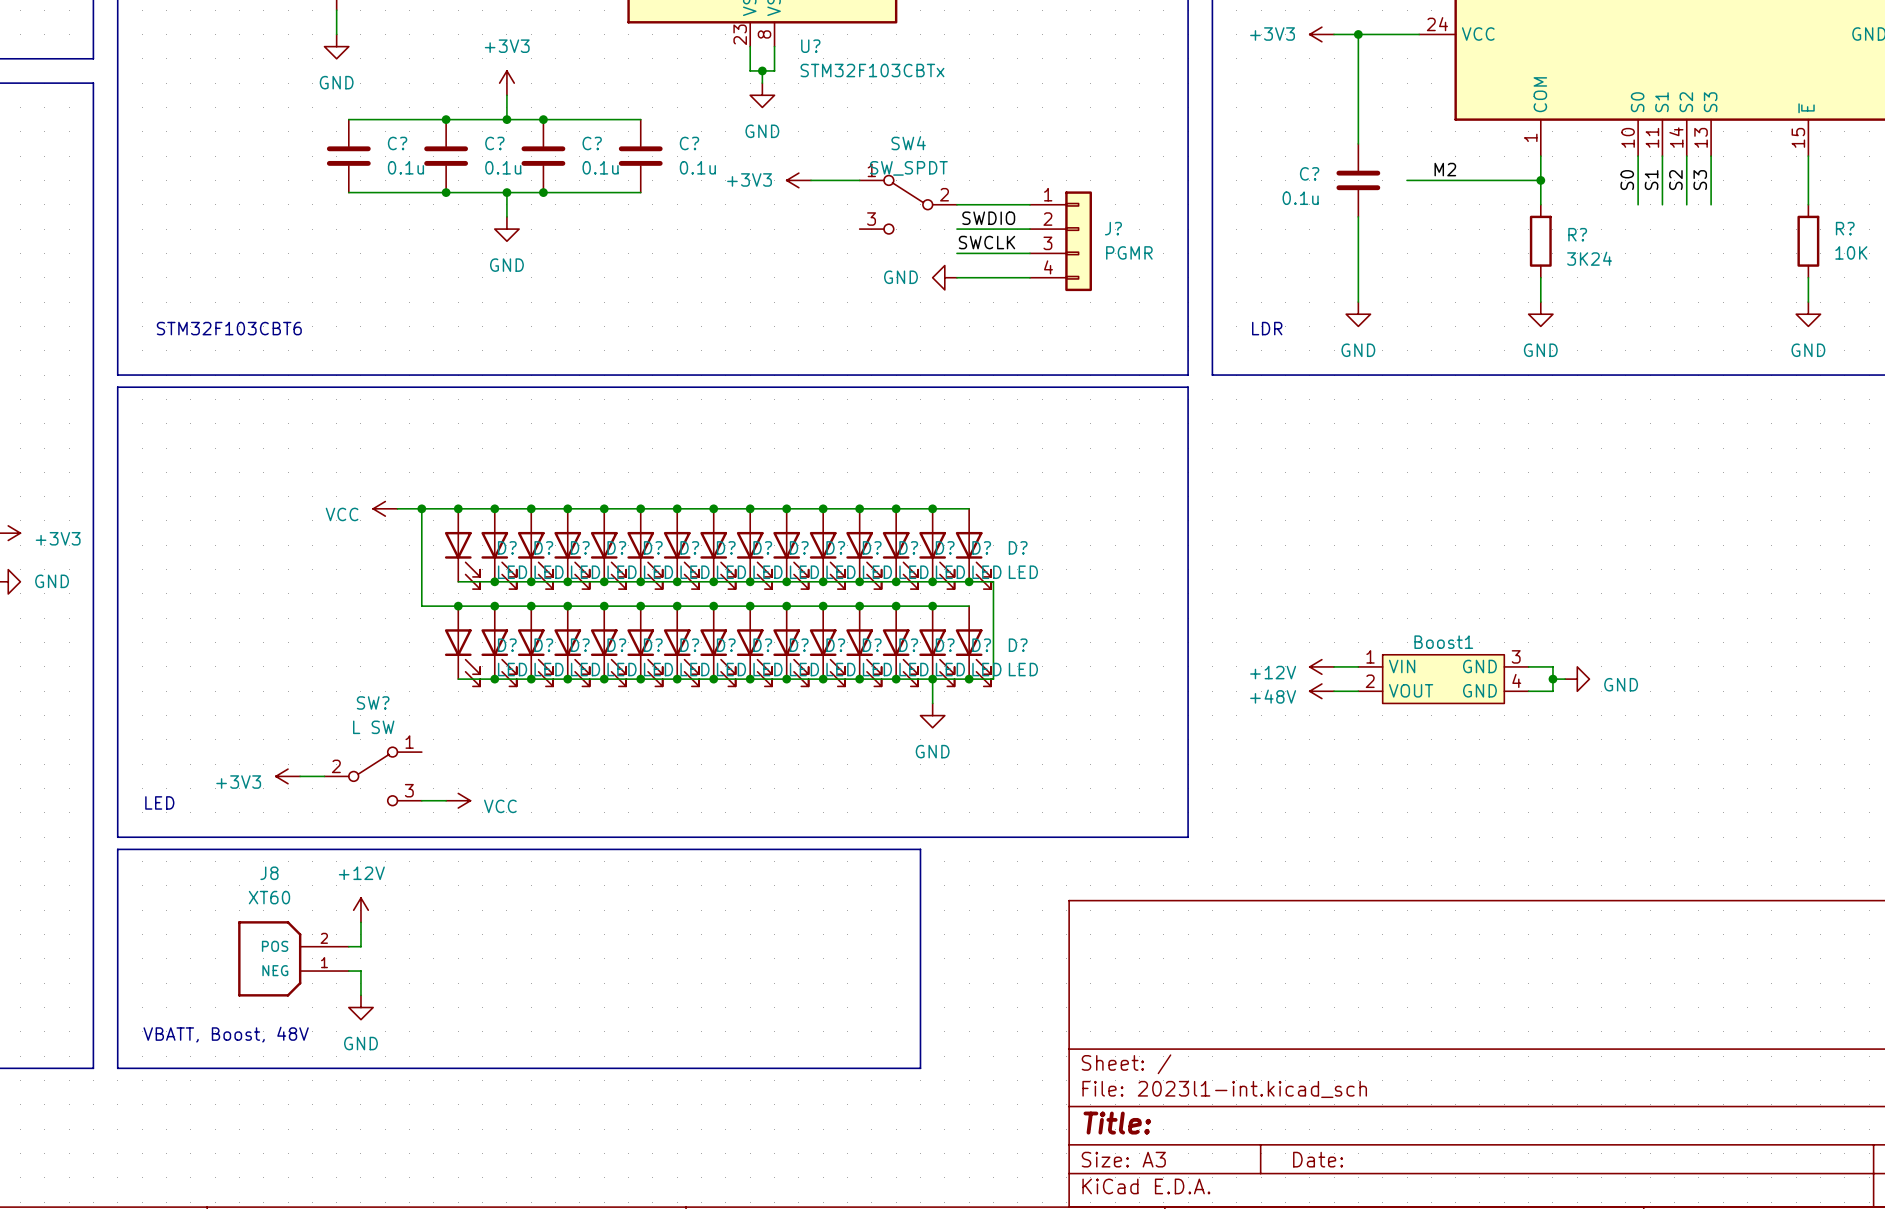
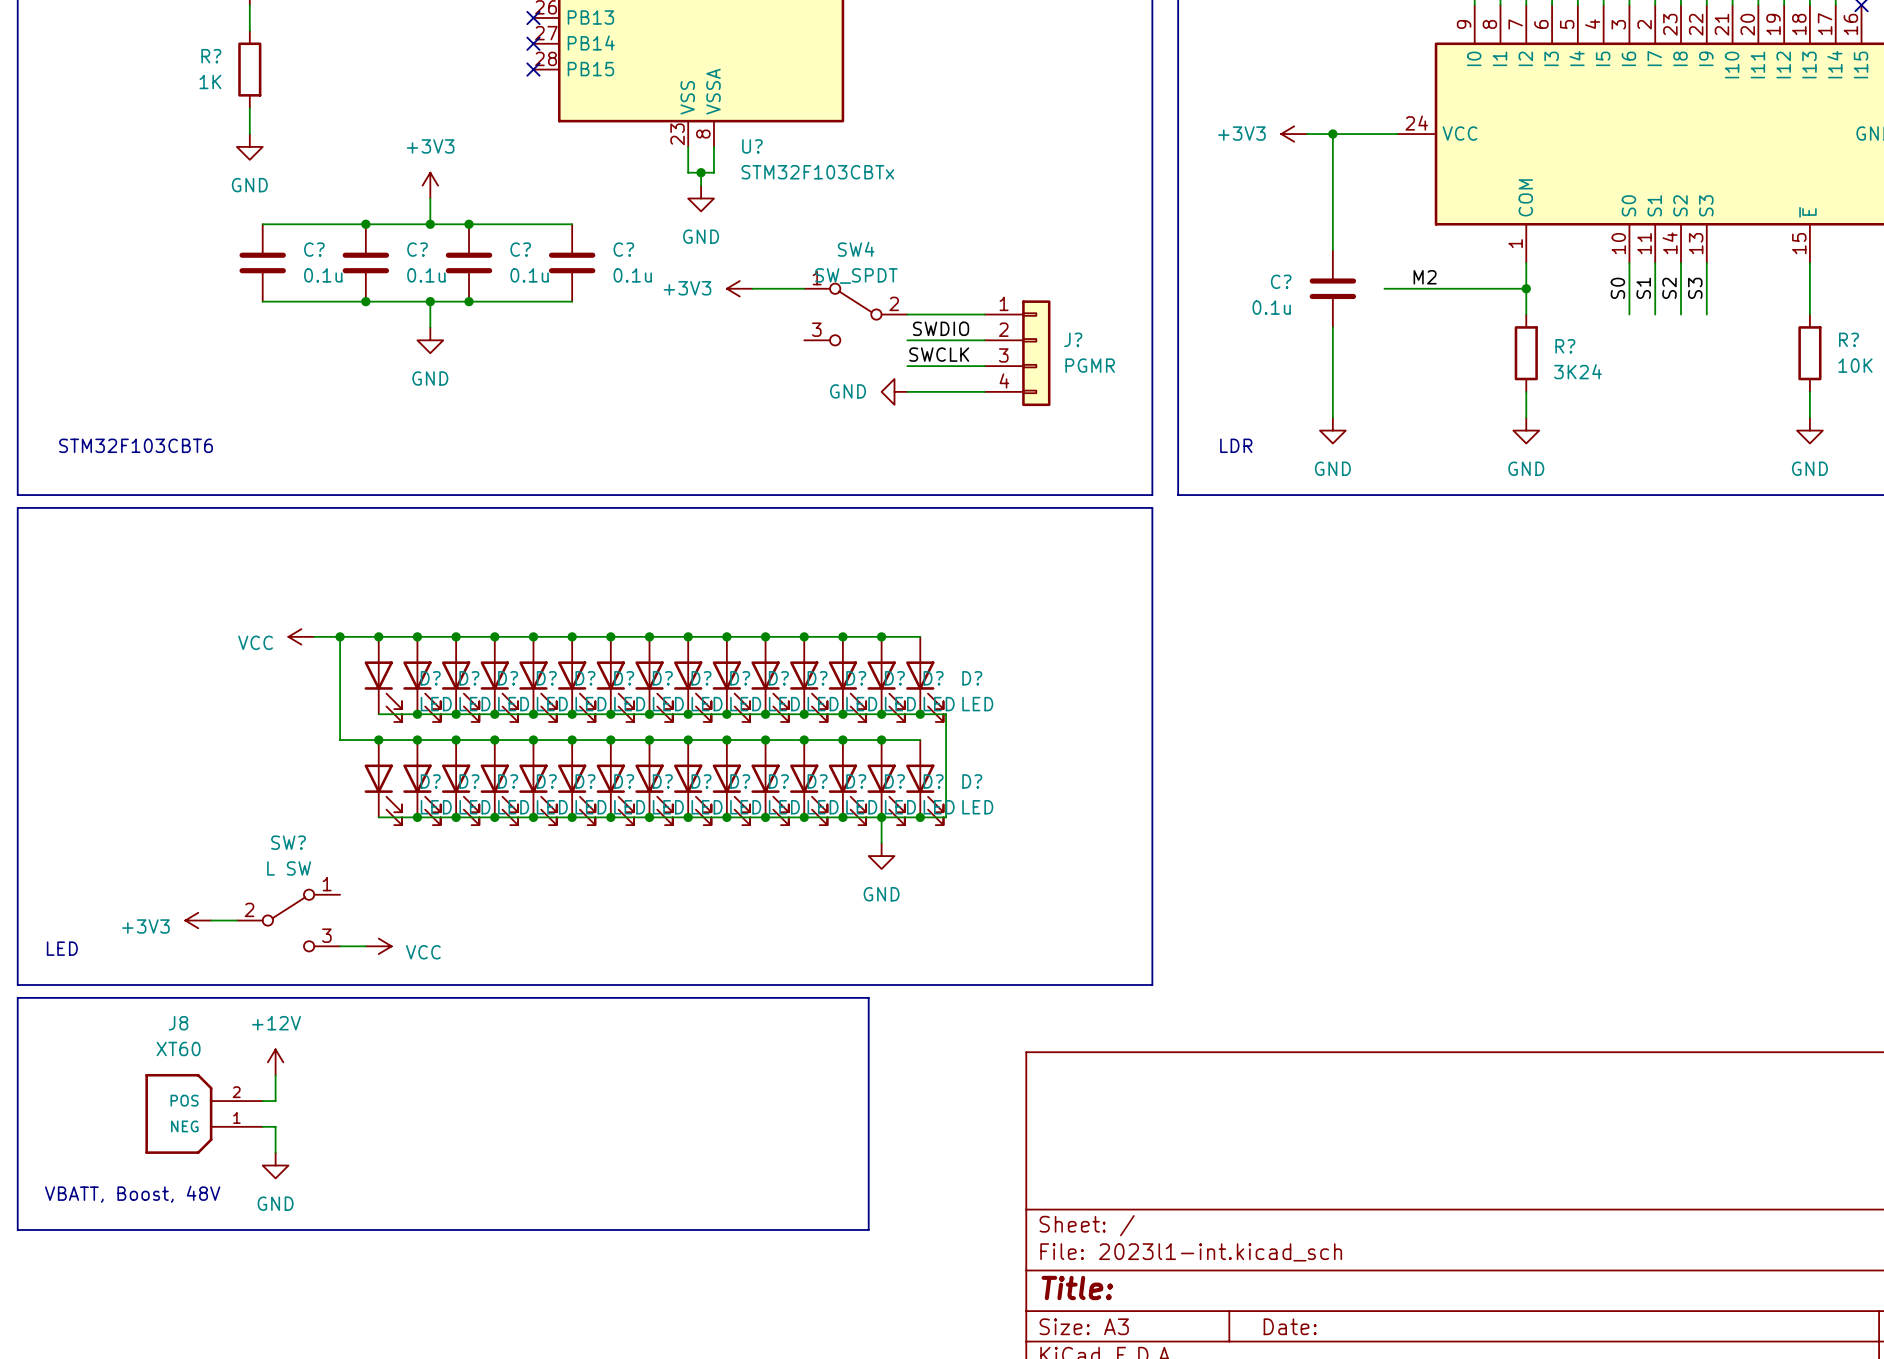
power symbol: +12V (1321, 666) -> none
wire: (1334, 666) (1358, 666) -> none
wire: (1528, 666) (1552, 666) (1552, 691) (1528, 691) -> none
Boost1: (1443, 679) -> none
wire: (1552, 679) (1565, 679) -> none
junction: (1552, 679) -> none
power symbol: GND (1577, 679) -> none
power symbol: +48V (1321, 691) -> none
wire: (1334, 691) (1358, 691) -> none

